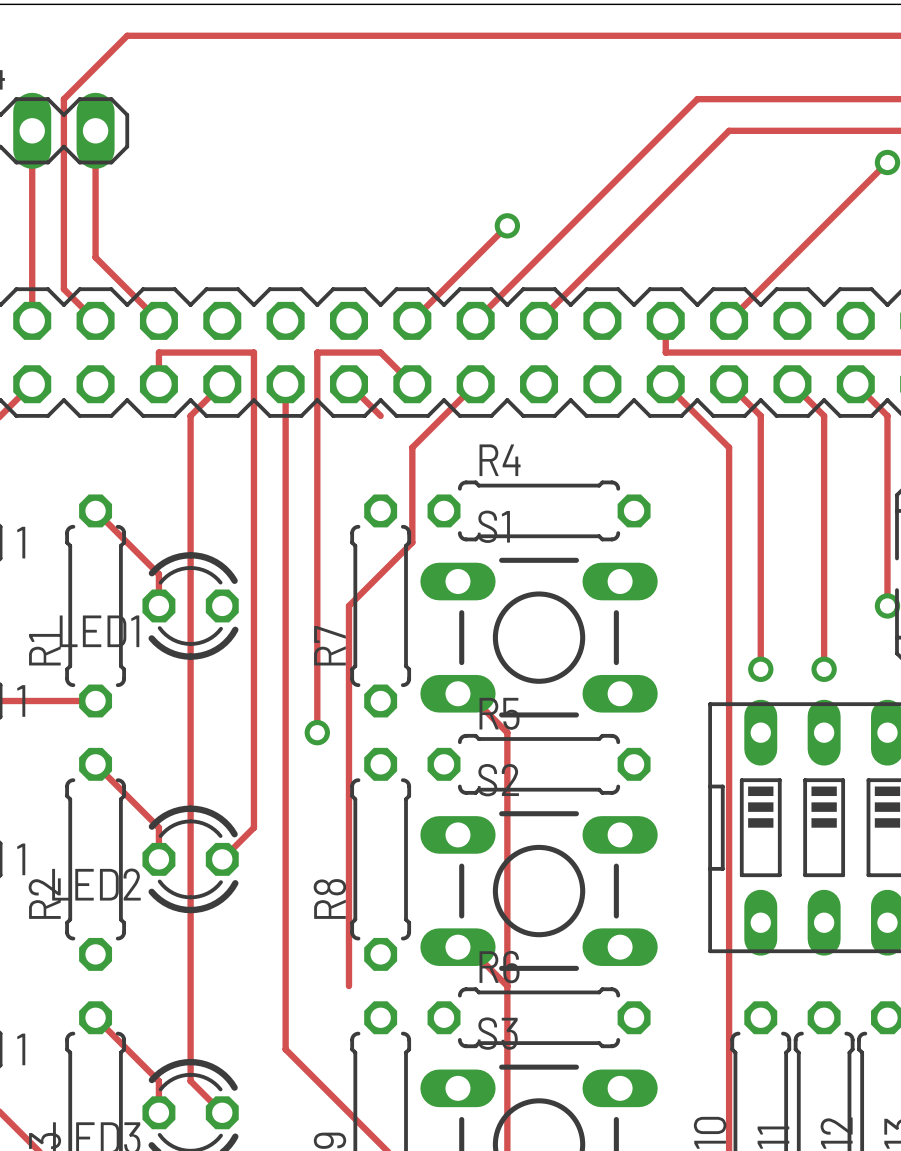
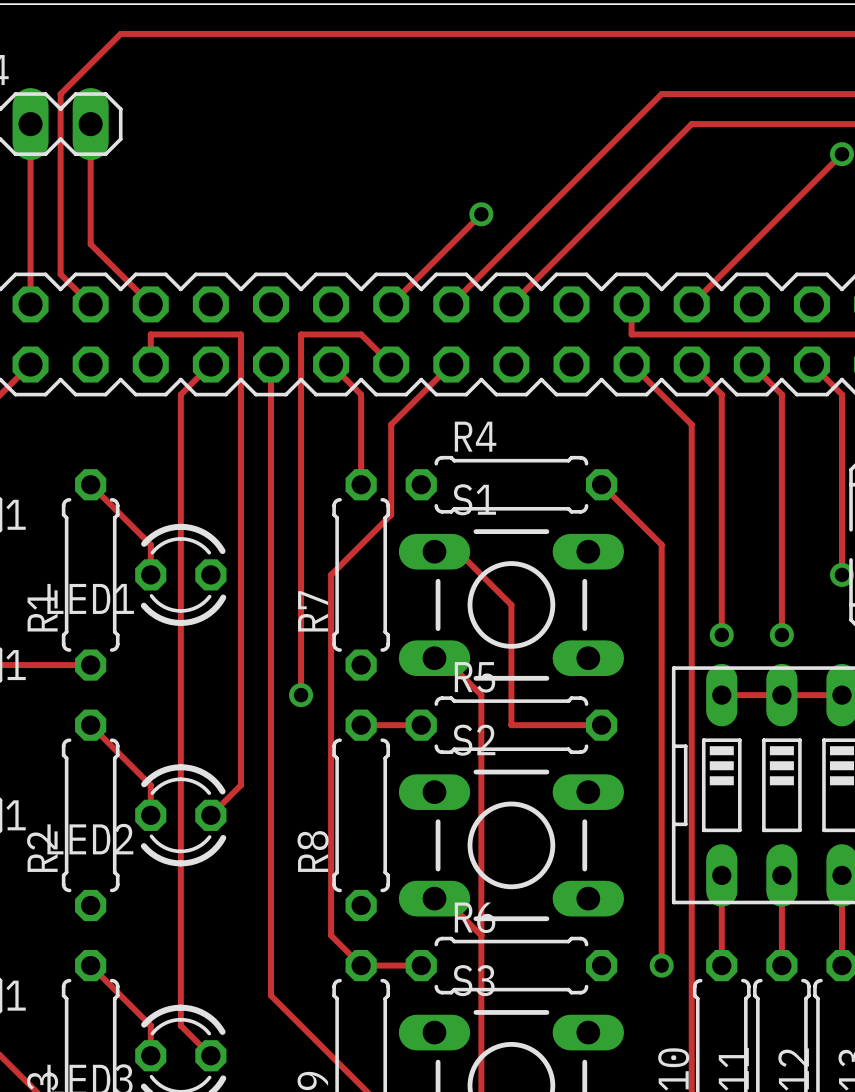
track: none -> (361, 394) (361, 484)
track: none -> (601, 484) (661, 544) (661, 965)
track: none -> (434, 551) (451, 544) (511, 604) (511, 725) (601, 725)
track: none -> (721, 695) (842, 695)
track: none -> (361, 725) (421, 725)
track: none -> (721, 875) (721, 965)
track: none -> (781, 875) (781, 965)
track: none -> (842, 875) (842, 965)
track: none -> (331, 935) (361, 965) (421, 965)
via: none -> (661, 965)

